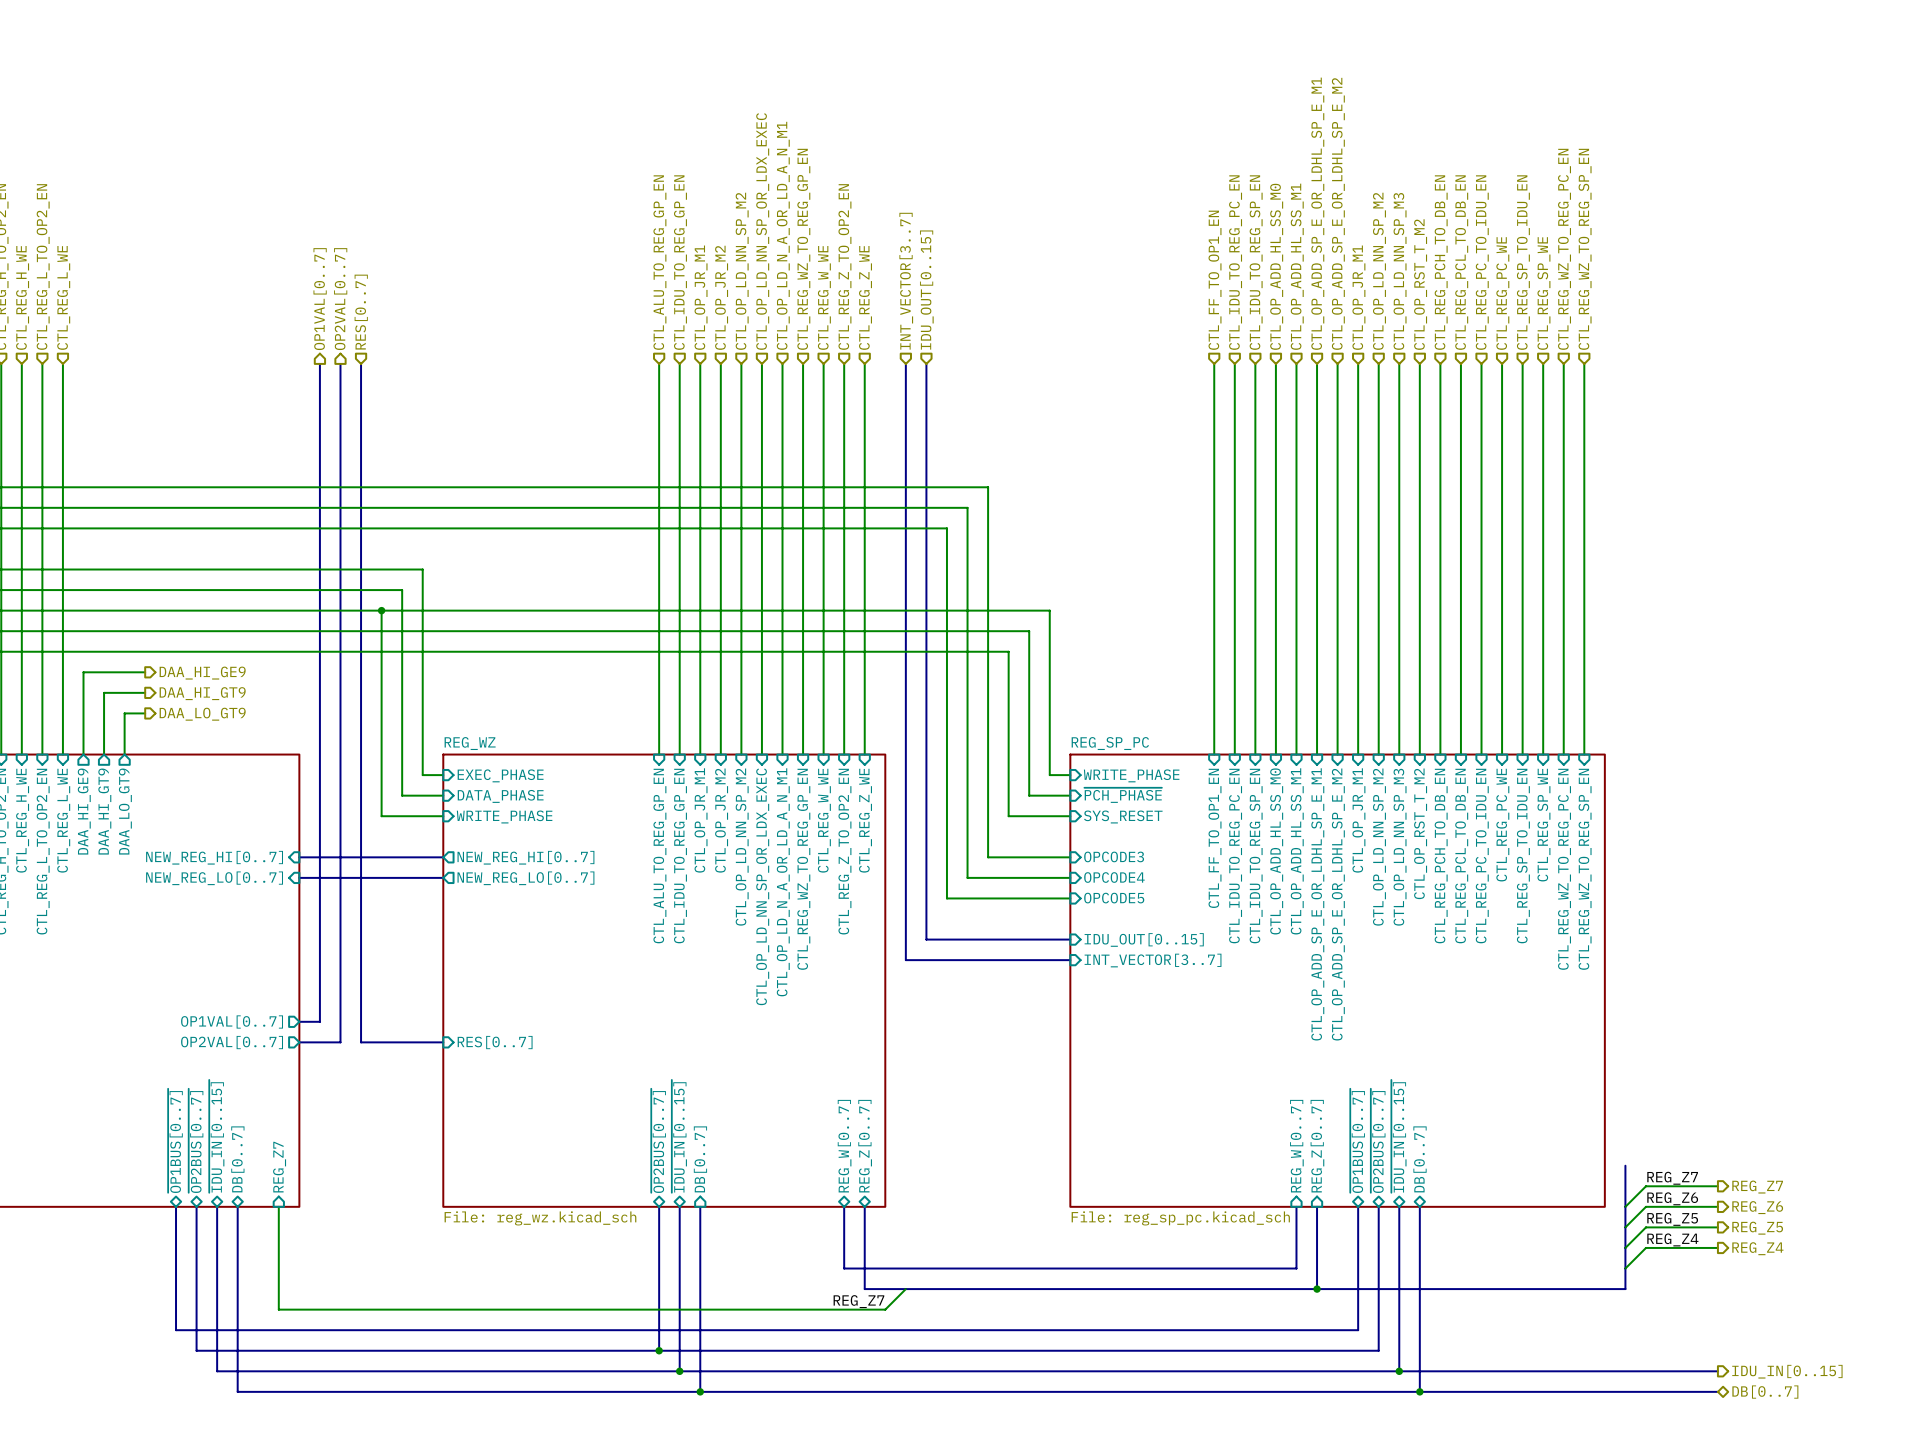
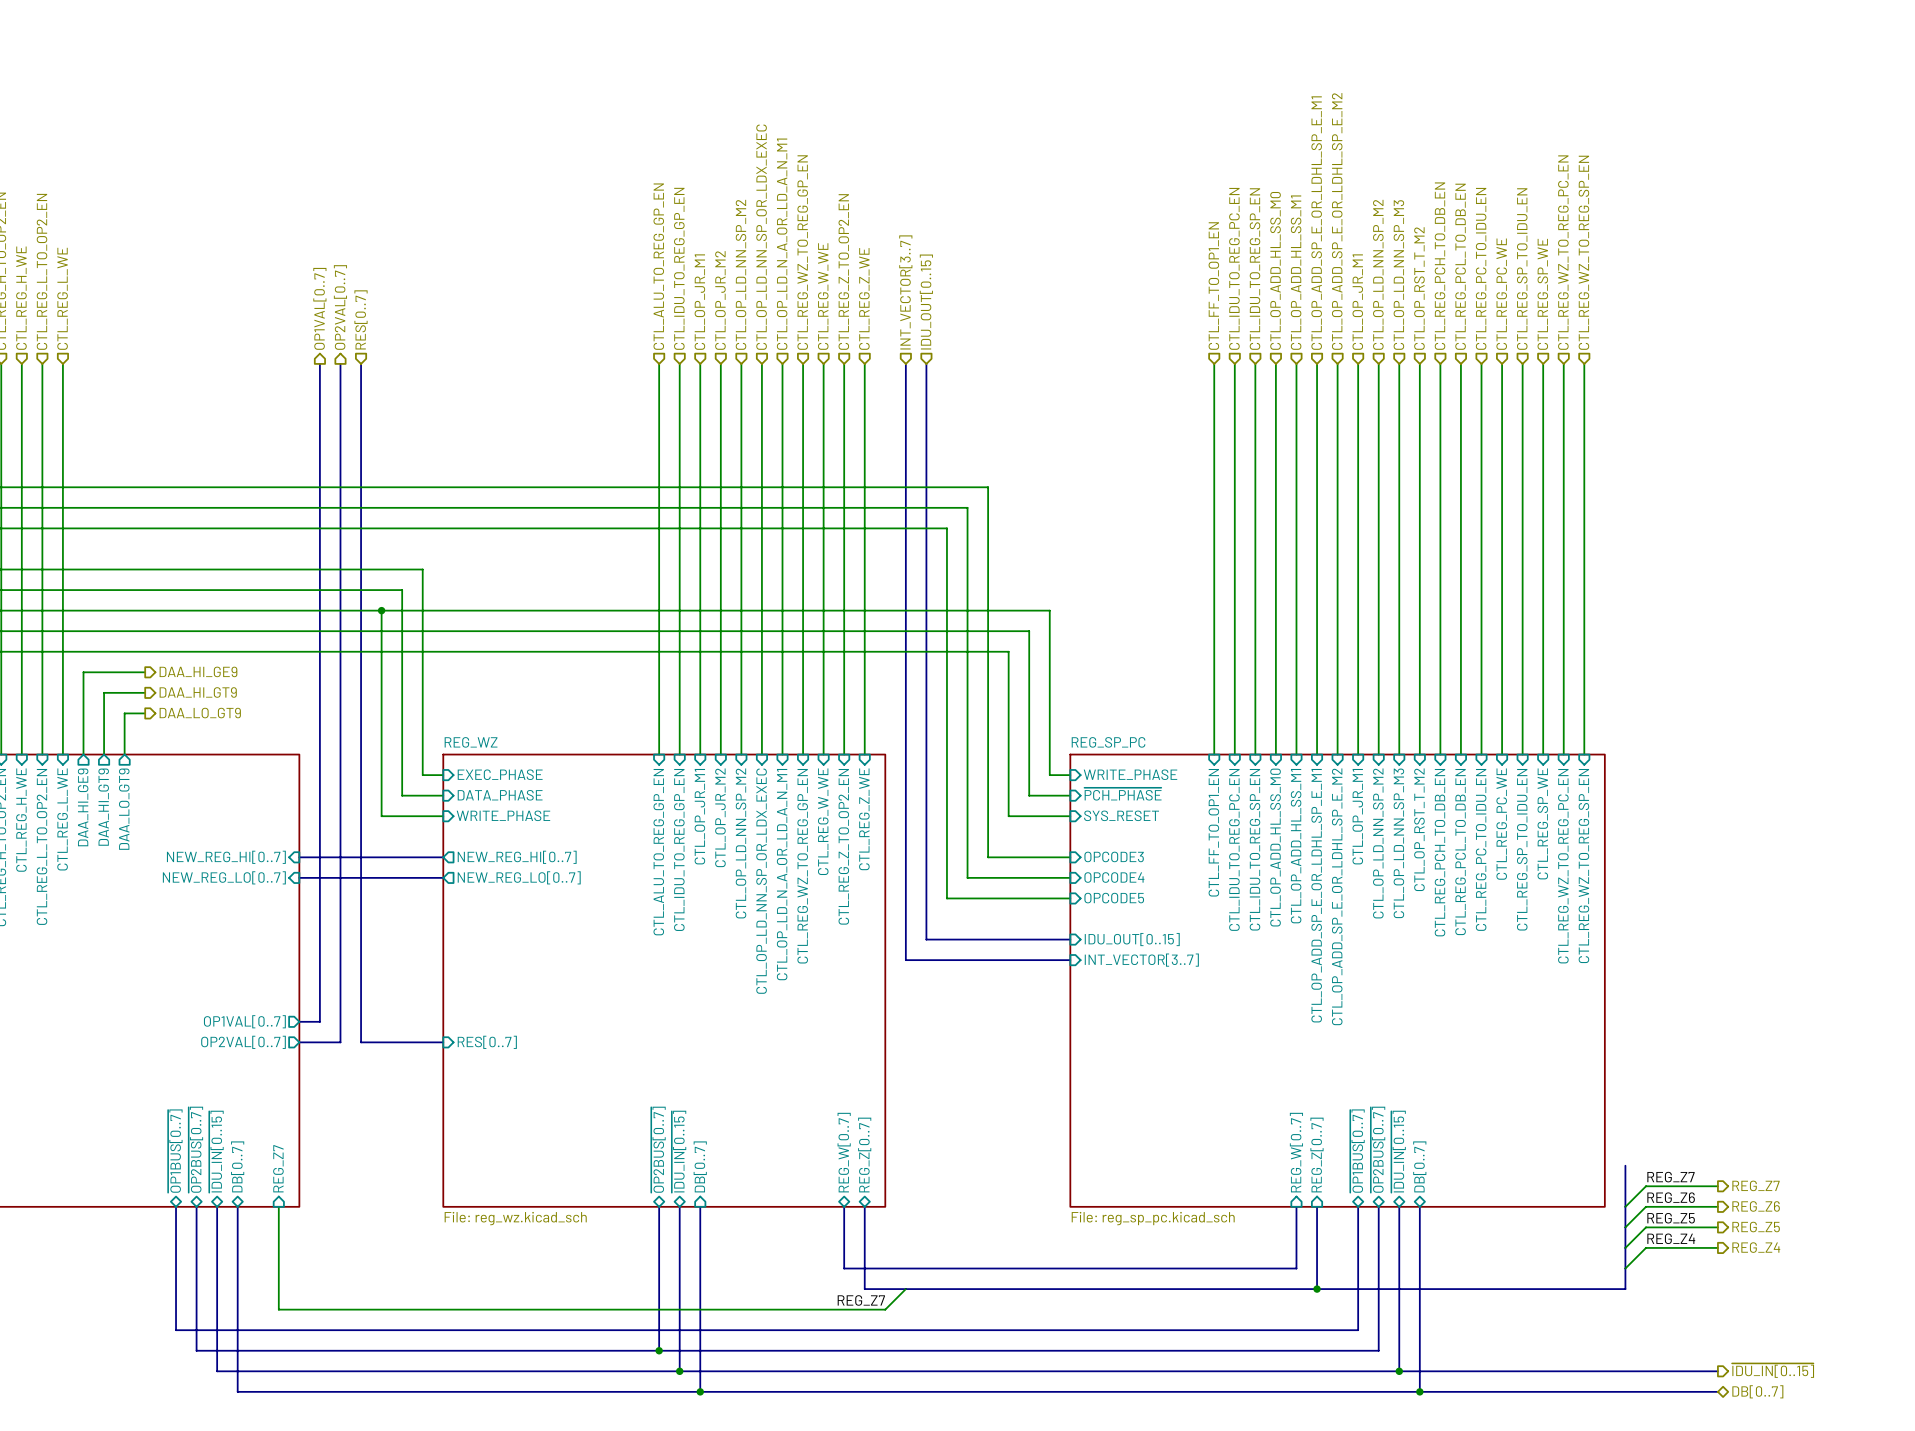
hierarchical label: IDU_IN[0..15] (1787, 1371) -> ~{IDU_IN[0..15]} (1773, 1370)

